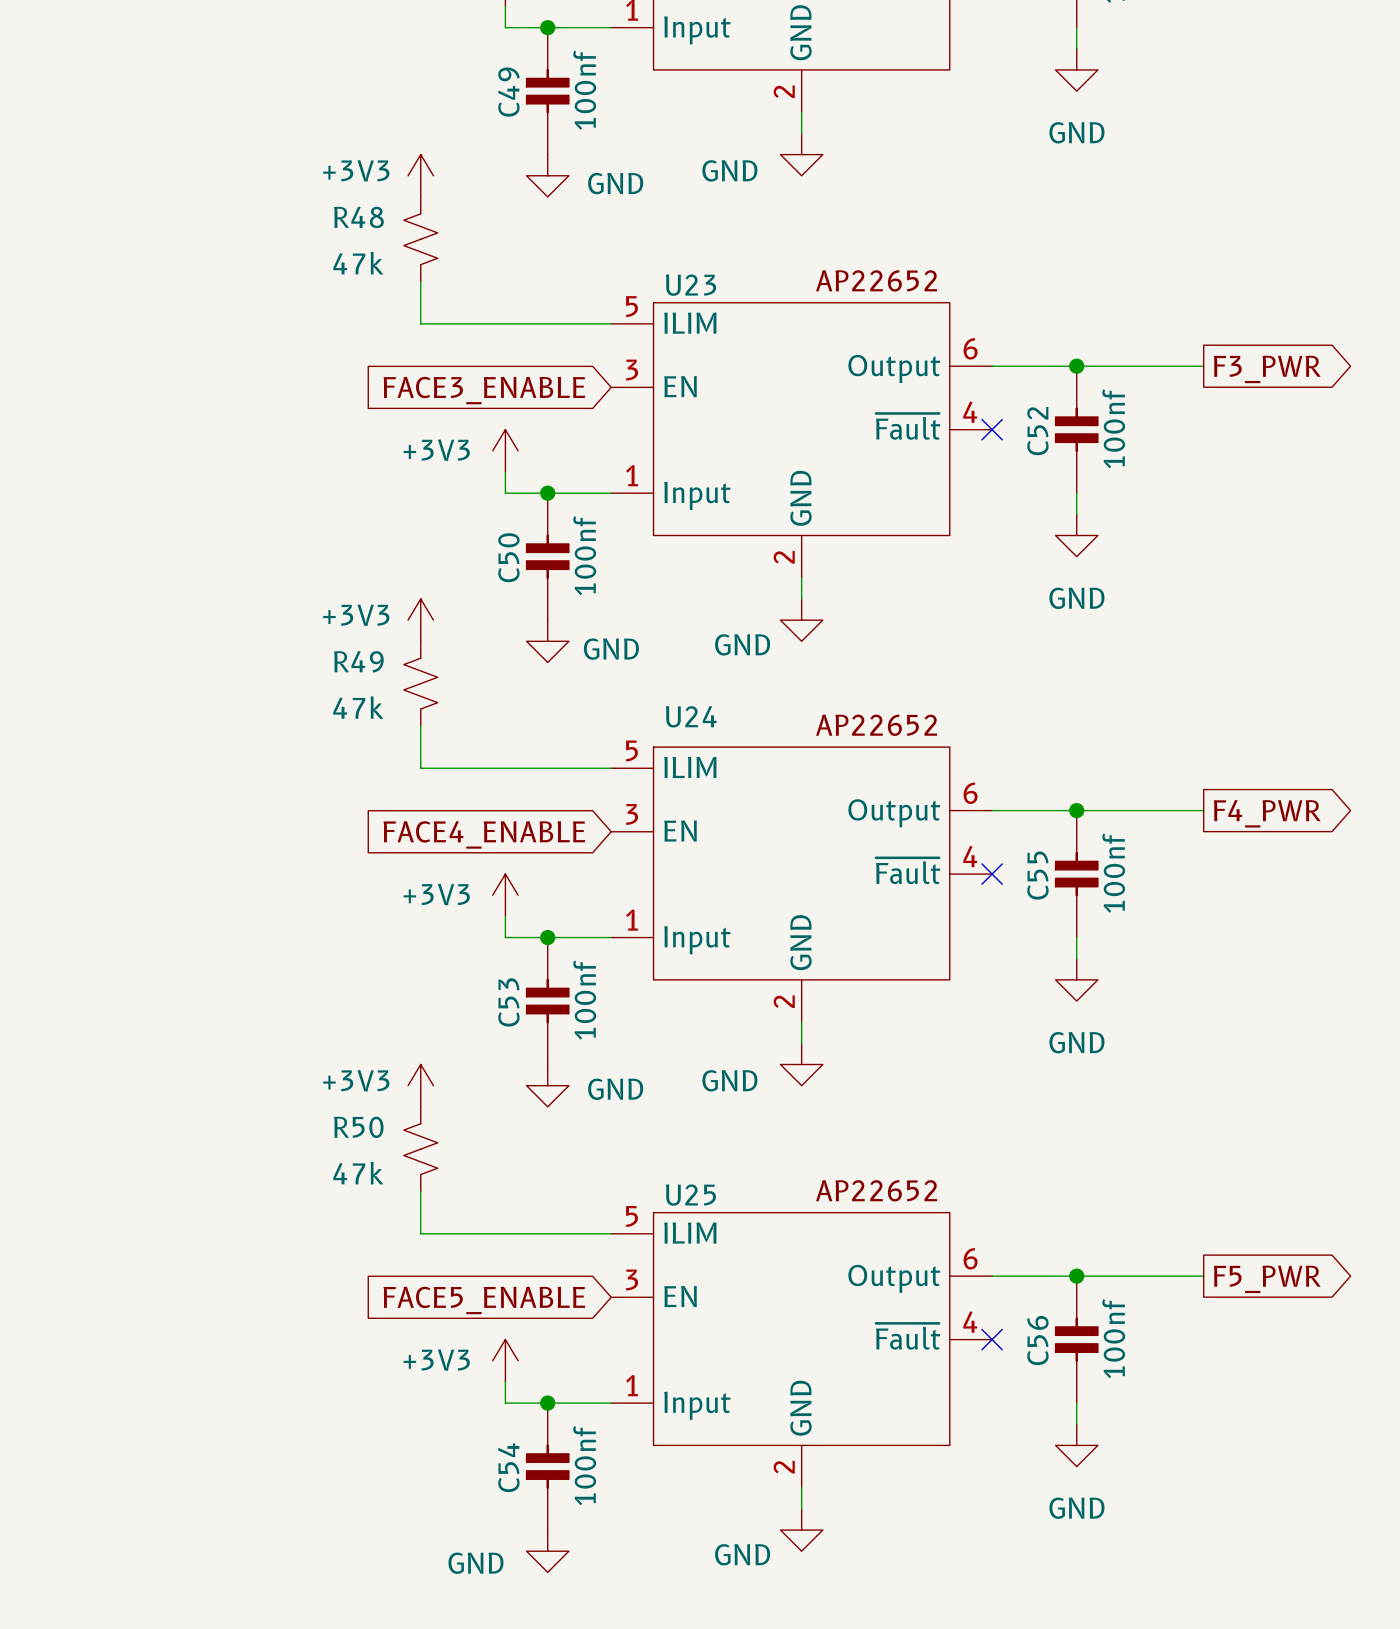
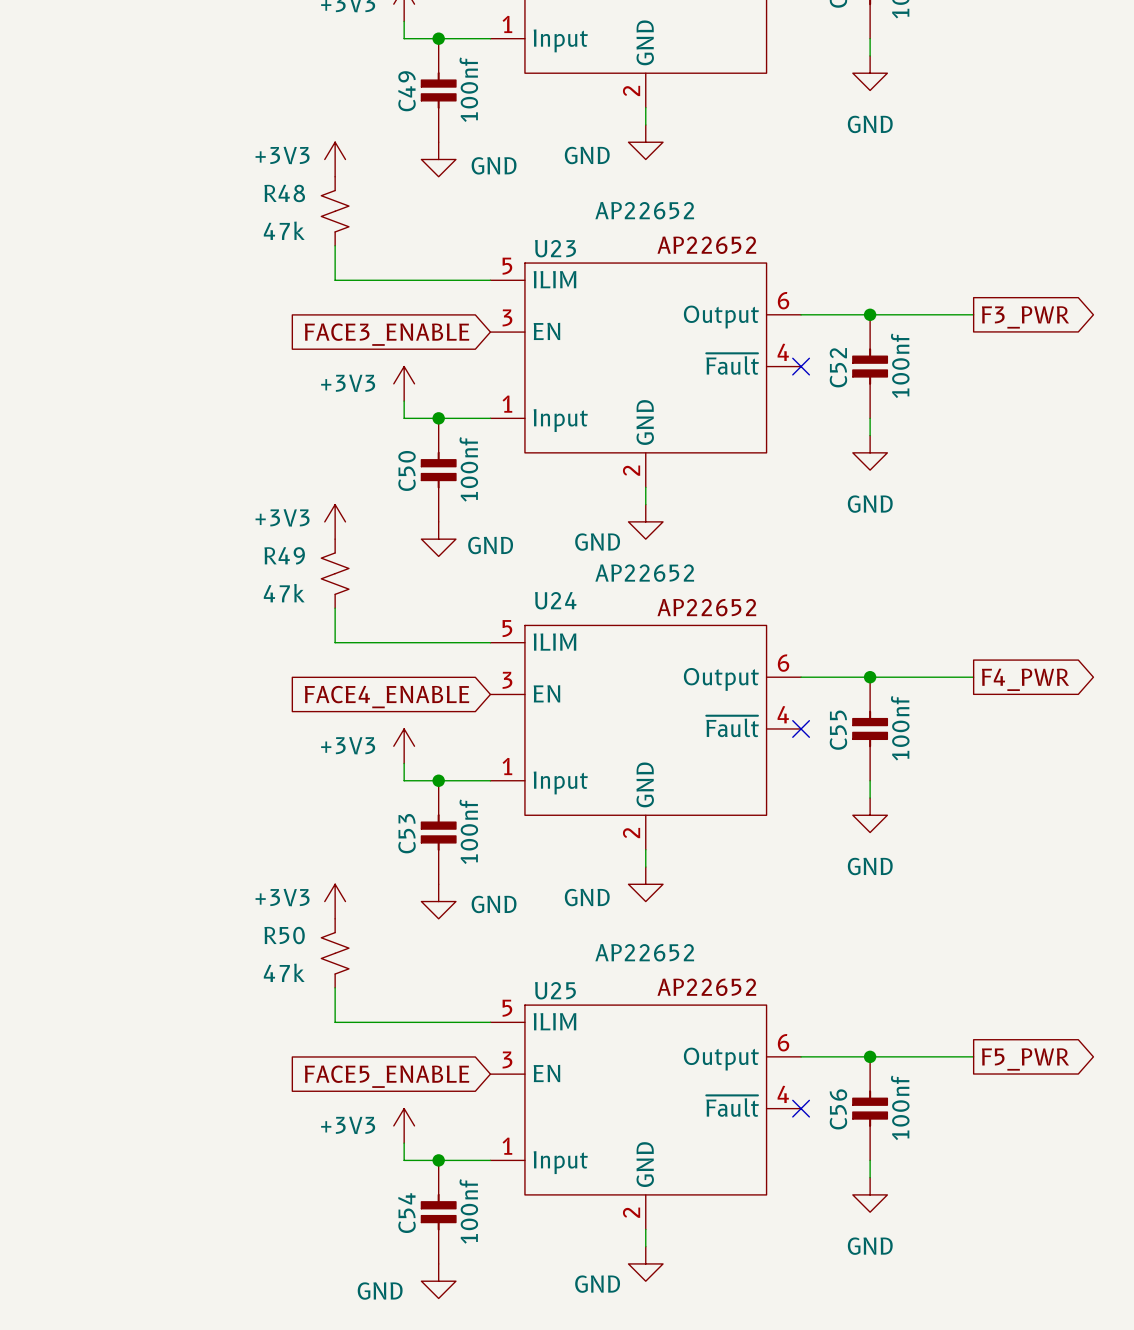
U23 value: none -> AP22652 (644, 210)
U24 value: none -> AP22652 (644, 573)
U25 value: none -> AP22652 (644, 952)

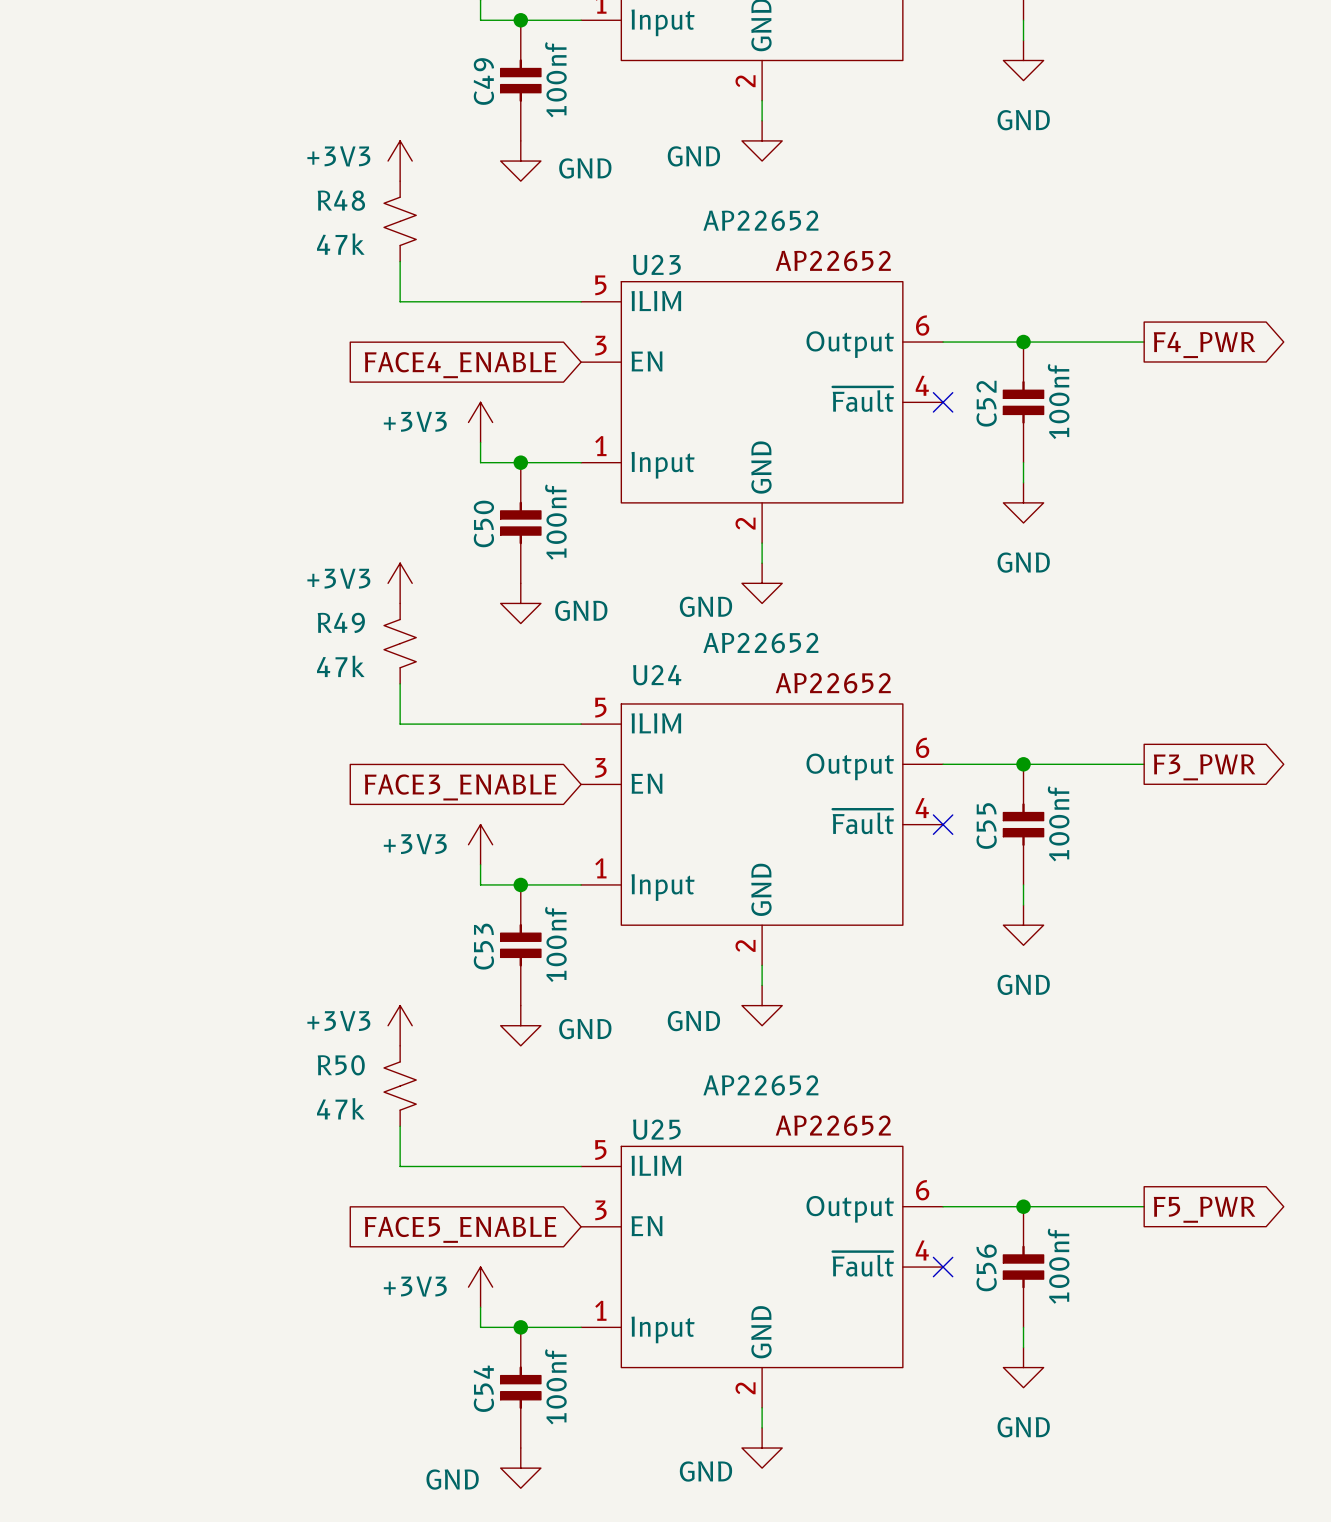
global label: F3_PWR (1025, 317) -> F4_PWR (1204, 345)
global label: FACE3_ENABLE (387, 334) -> FACE4_ENABLE (460, 365)
global label: F4_PWR (1025, 679) -> F3_PWR (1204, 767)
global label: FACE4_ENABLE (387, 697) -> FACE3_ENABLE (460, 787)

